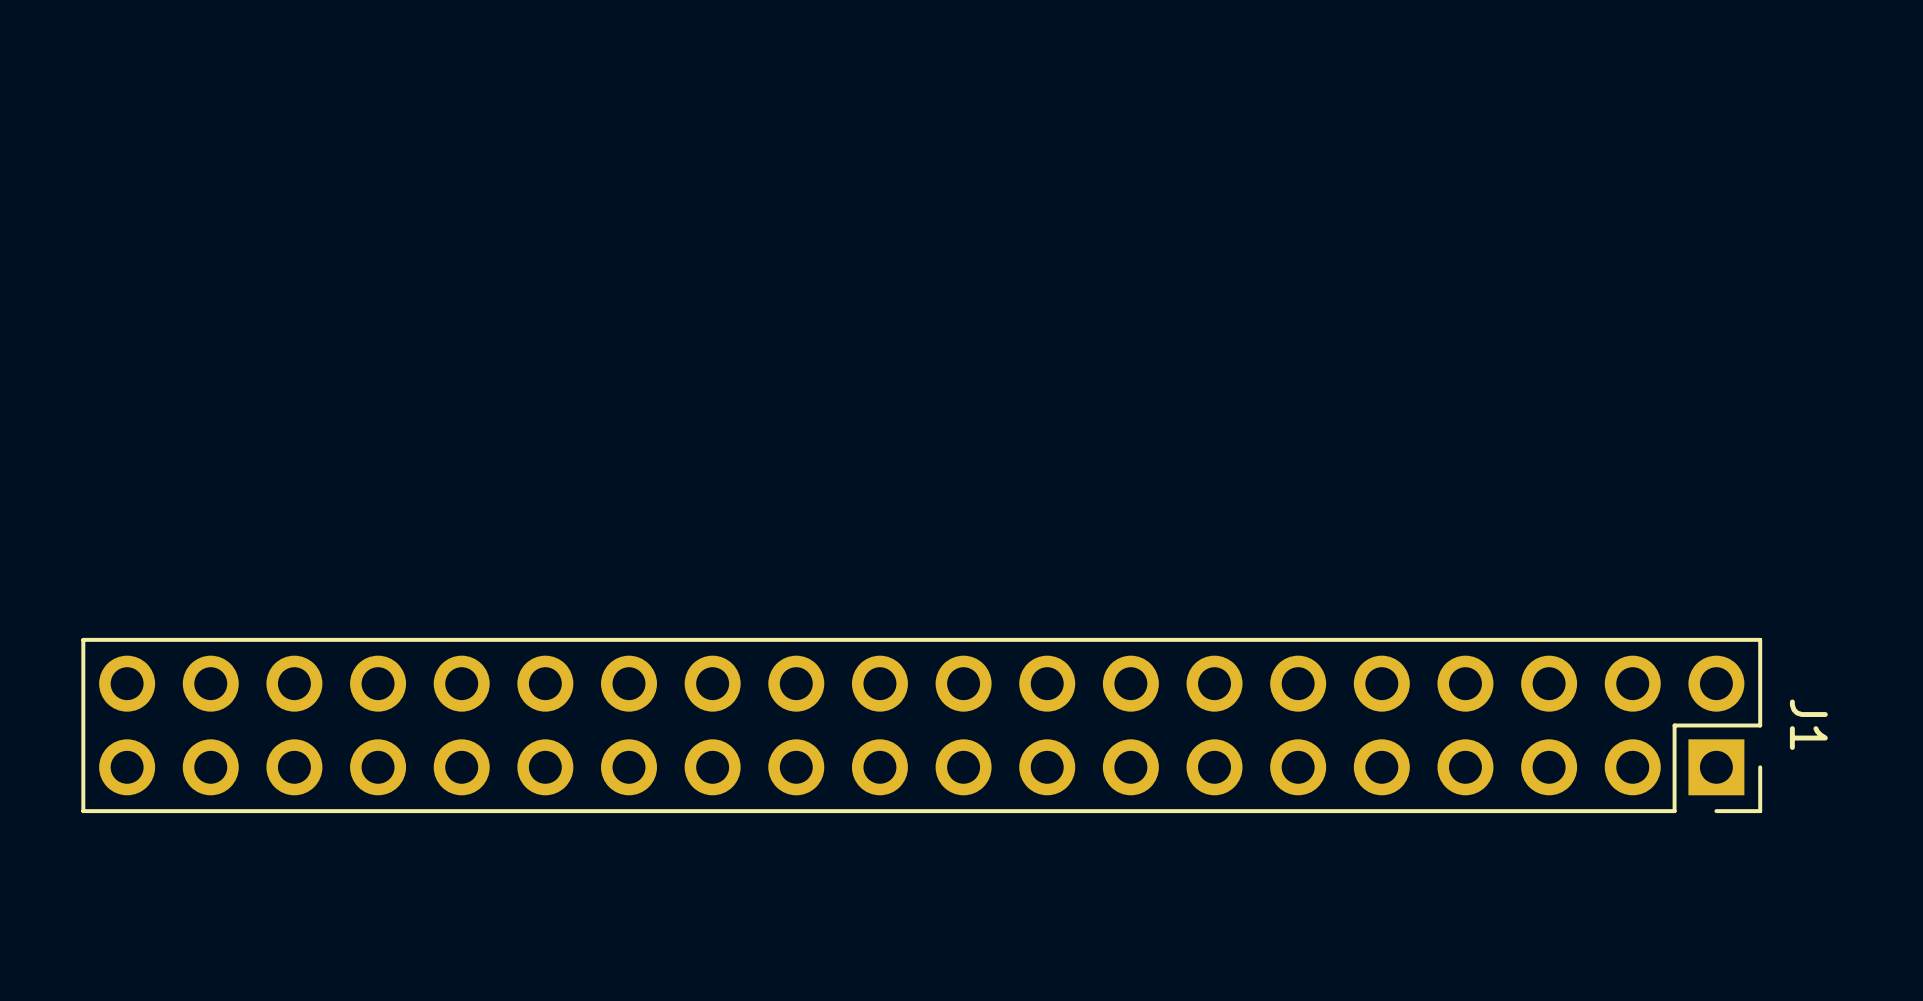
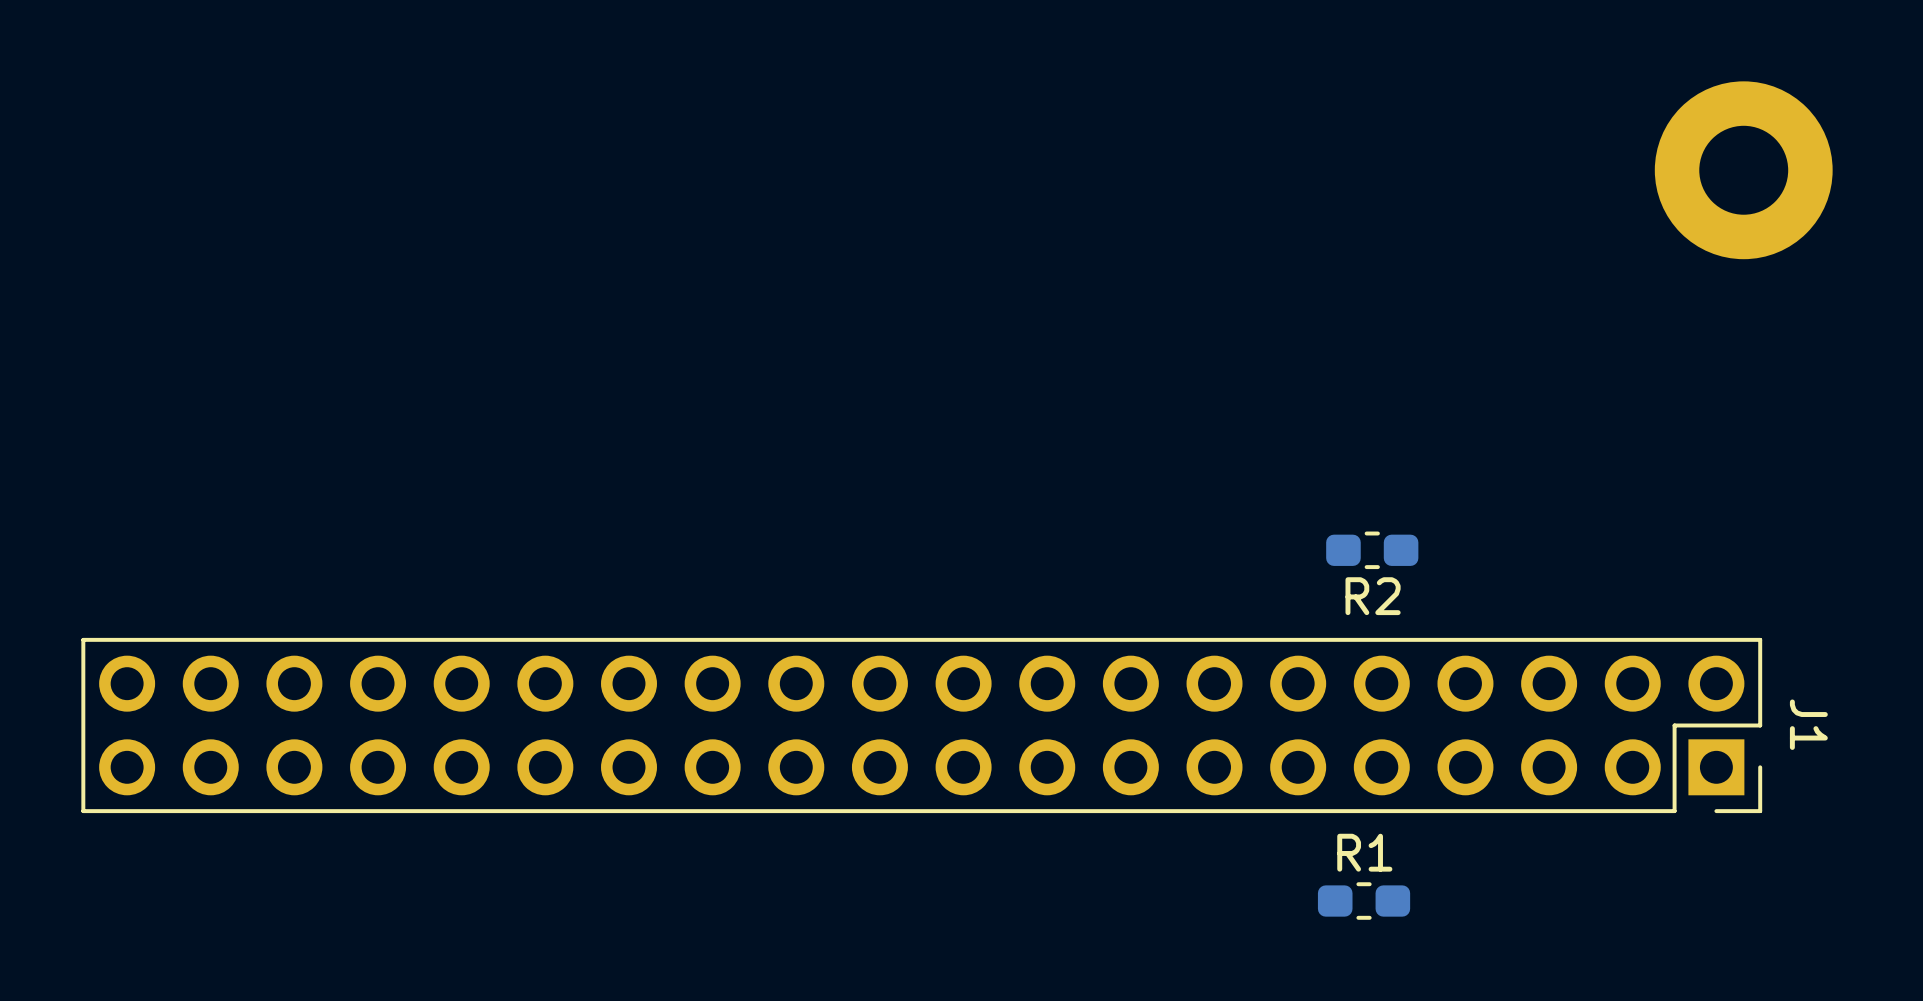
part: none -> (1743, 170)
R2: none -> (1372, 550)
R1: none -> (1364, 901)

